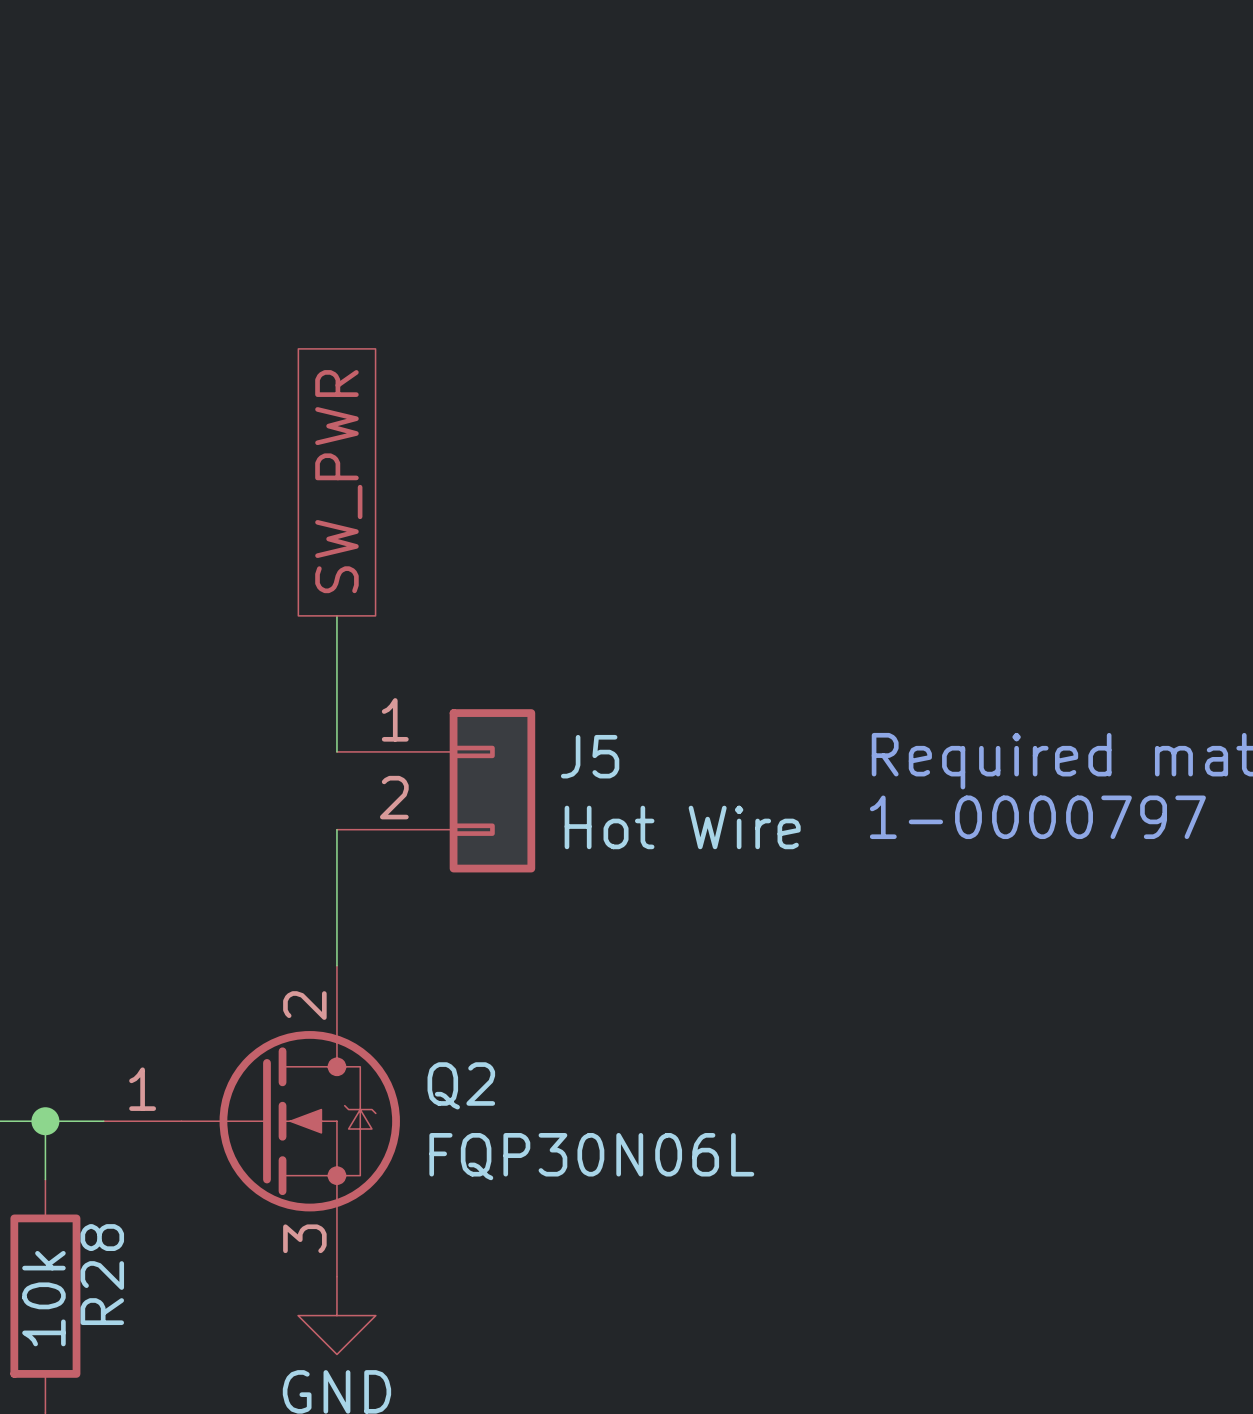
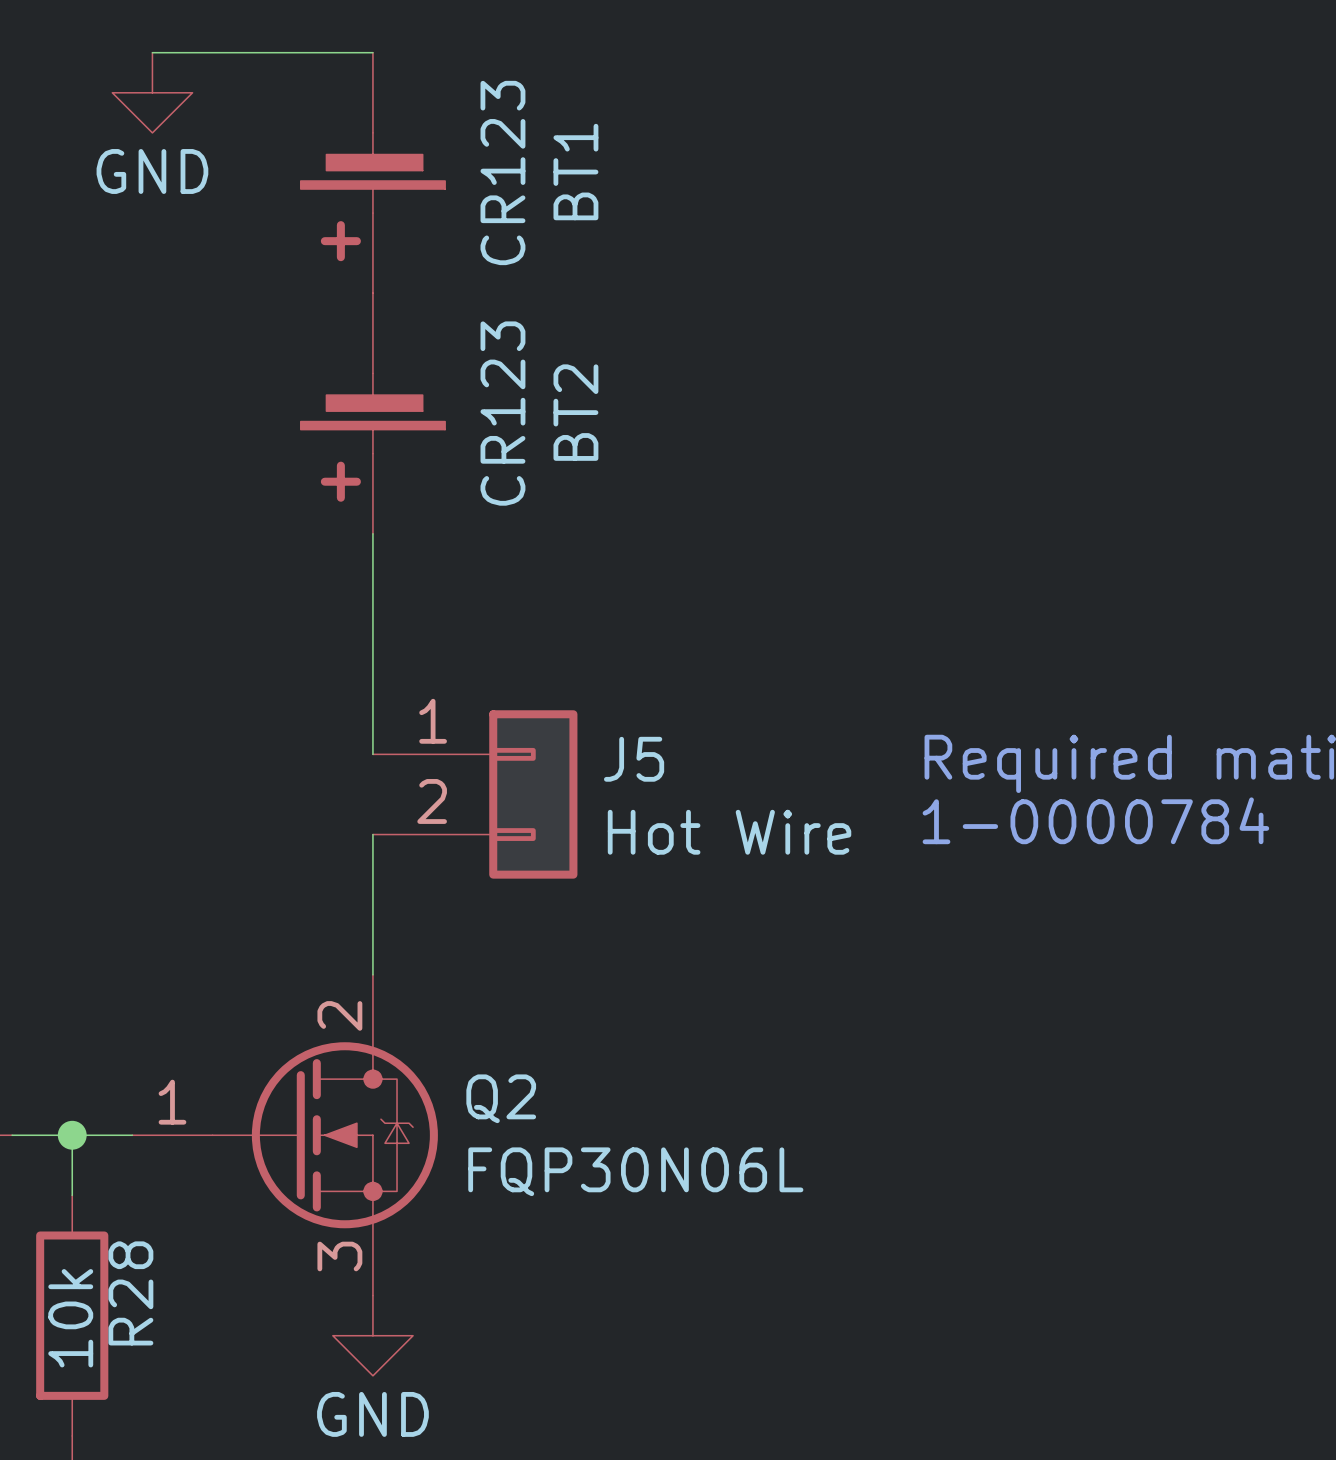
wire: none -> (152, 52) (372, 52)
power symbol: none -> GND (152, 92)
BT1: none -> CR123 (372, 172)
BT2: none -> CR123 (372, 413)
global label: SW_PWR (338, 481) -> none
wire: none -> (372, 533) (372, 614)
text: 1-0000797 (1037, 817) -> 1-0000784 (1095, 820)

